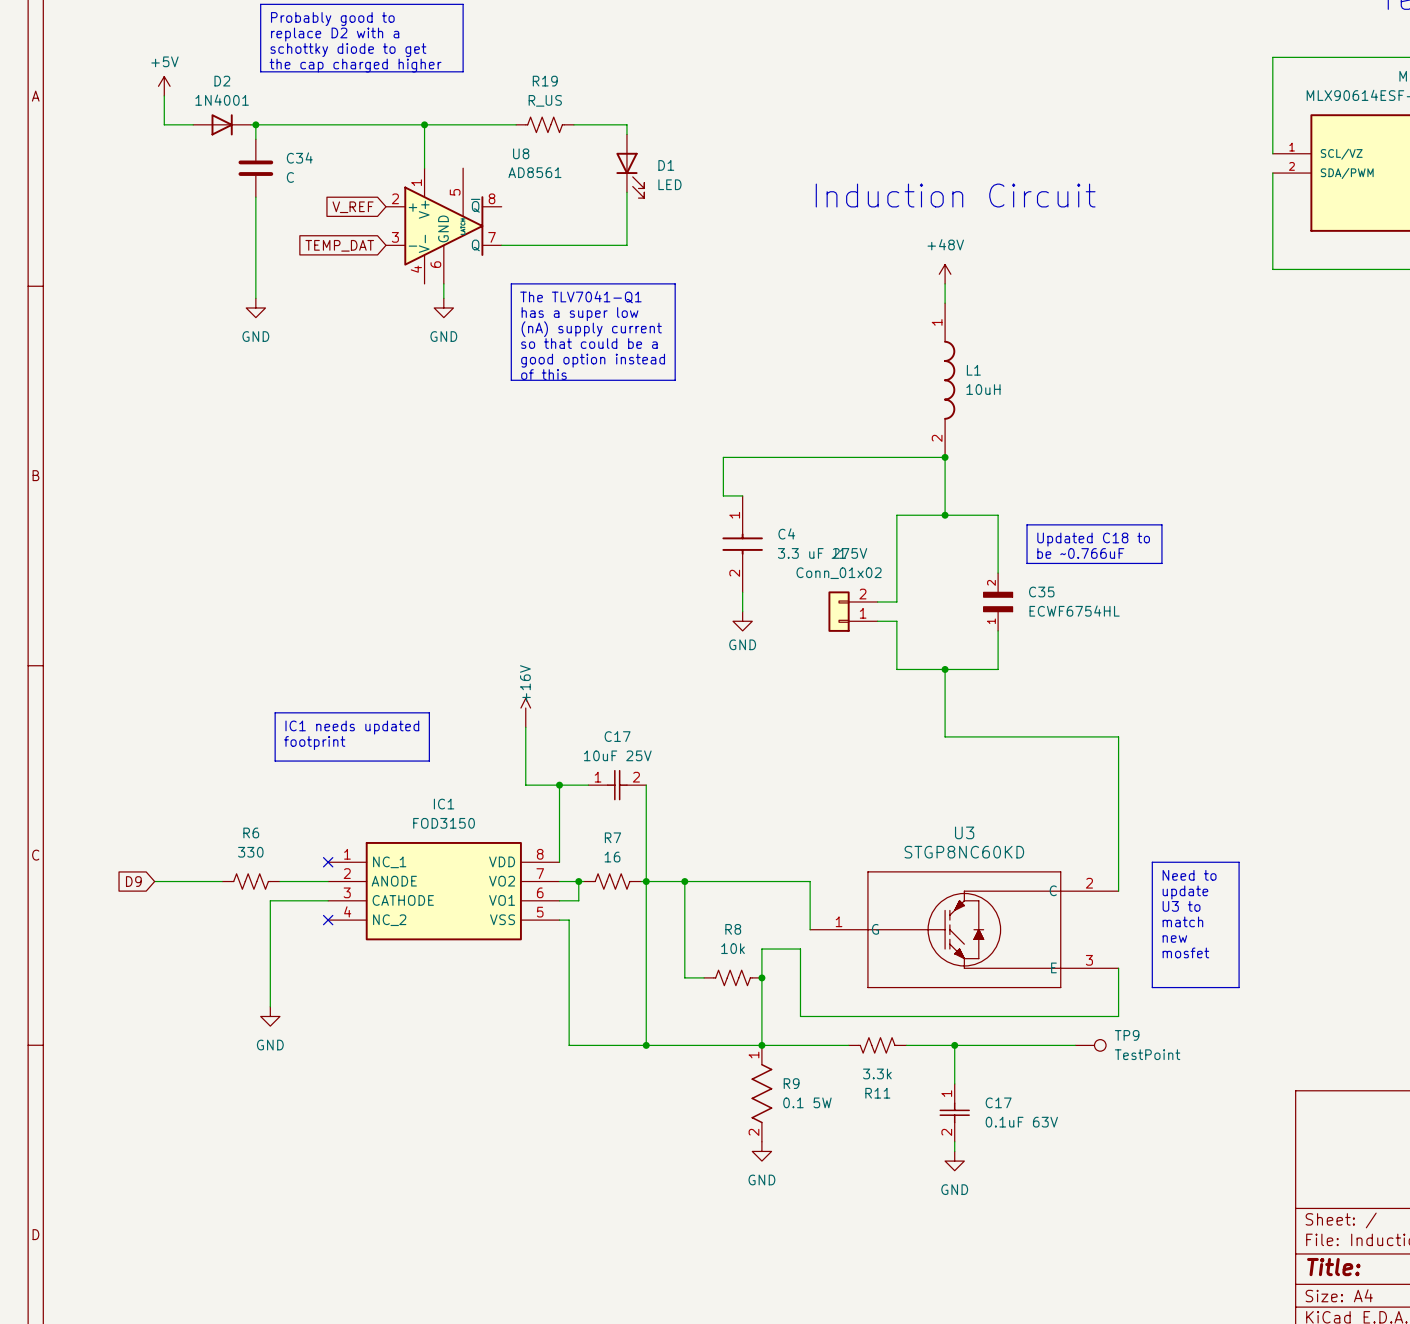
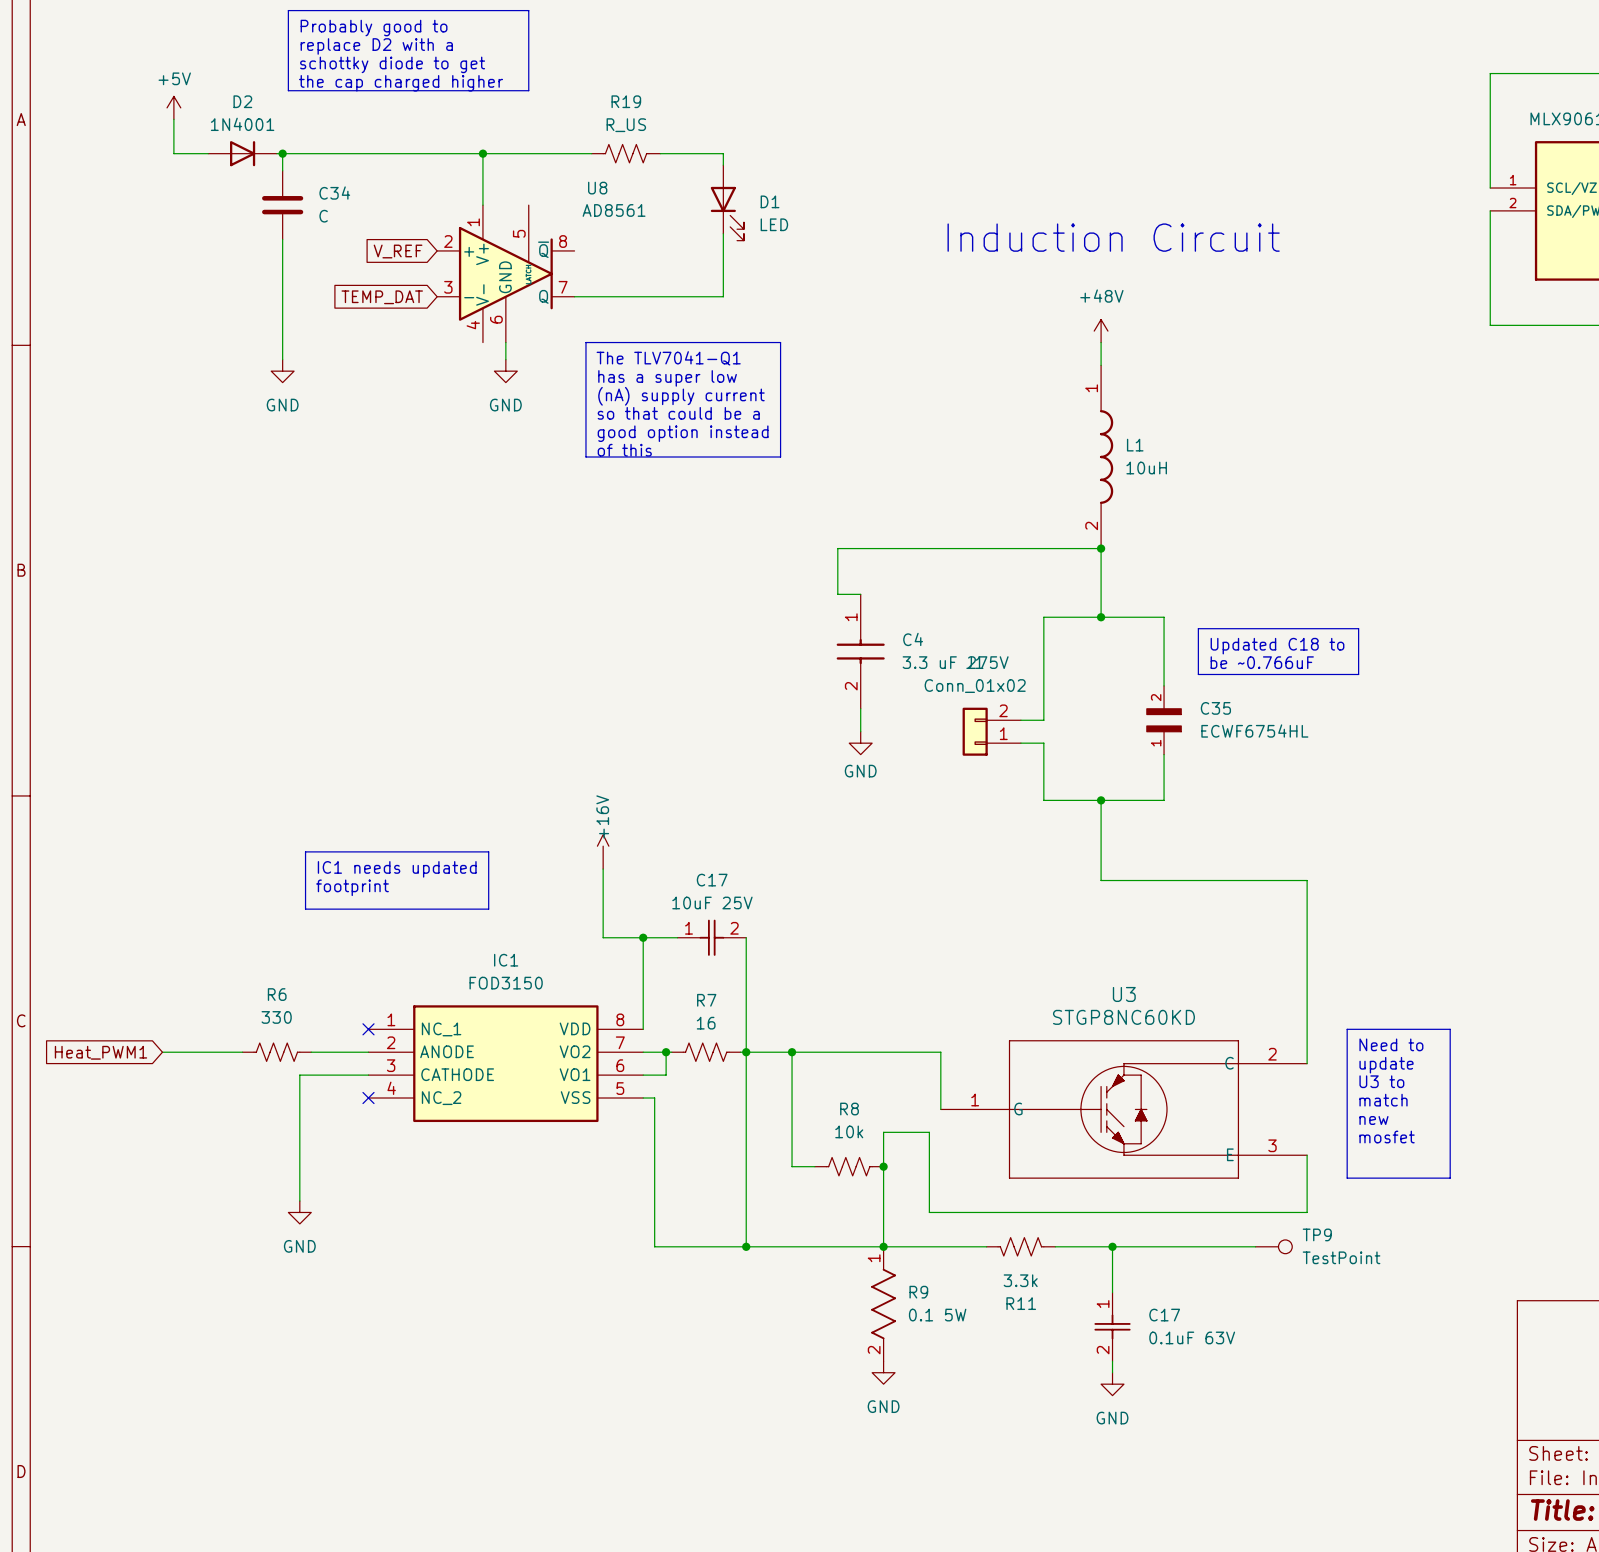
global label: D9 (133, 881) -> Heat_PWM1 (100, 1052)

